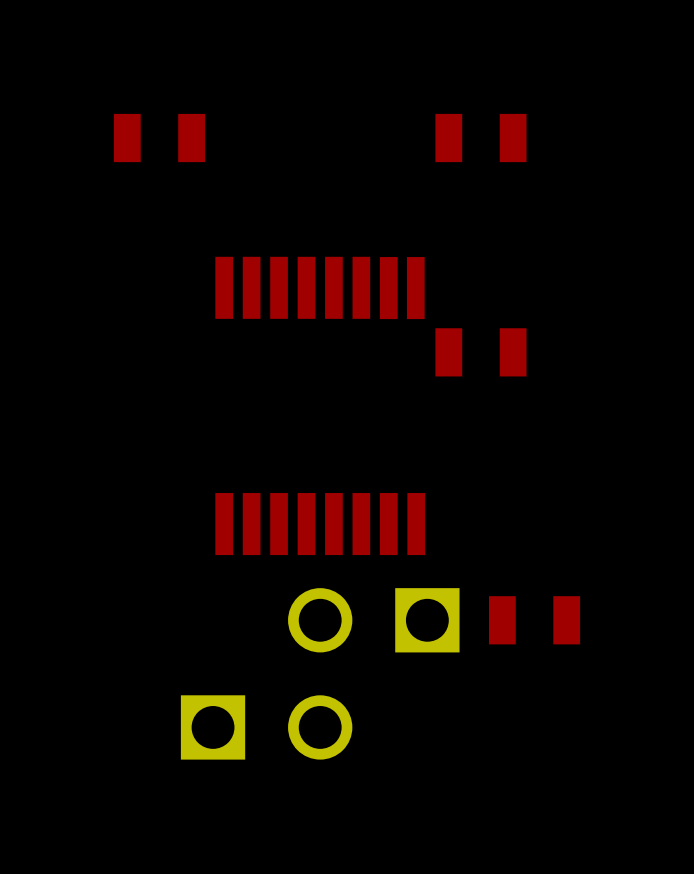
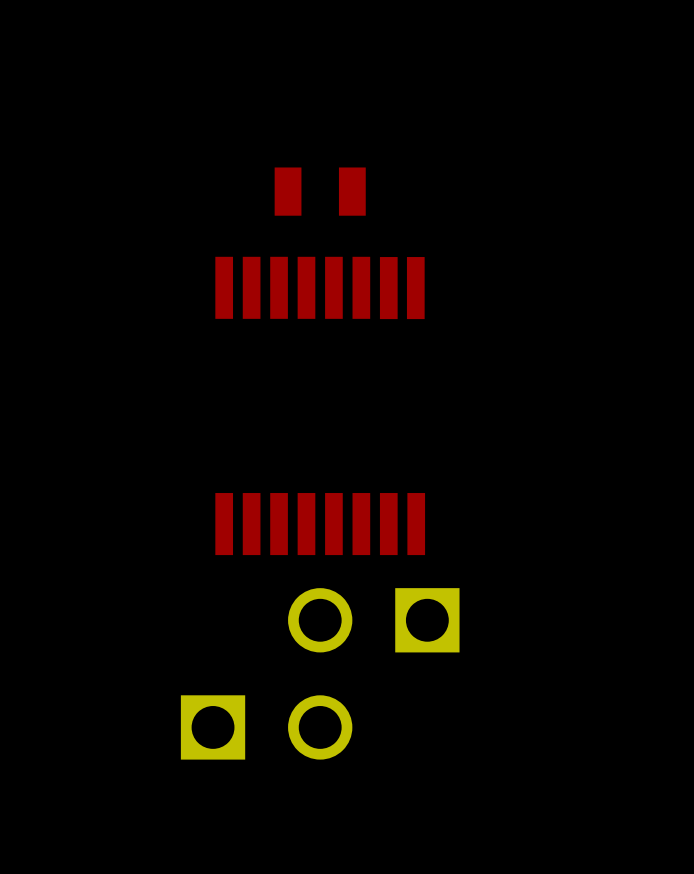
part: (159, 138) -> none
part: (480, 138) -> none
part: none -> (320, 191)
part: (480, 352) -> none
part: (534, 620) -> none

